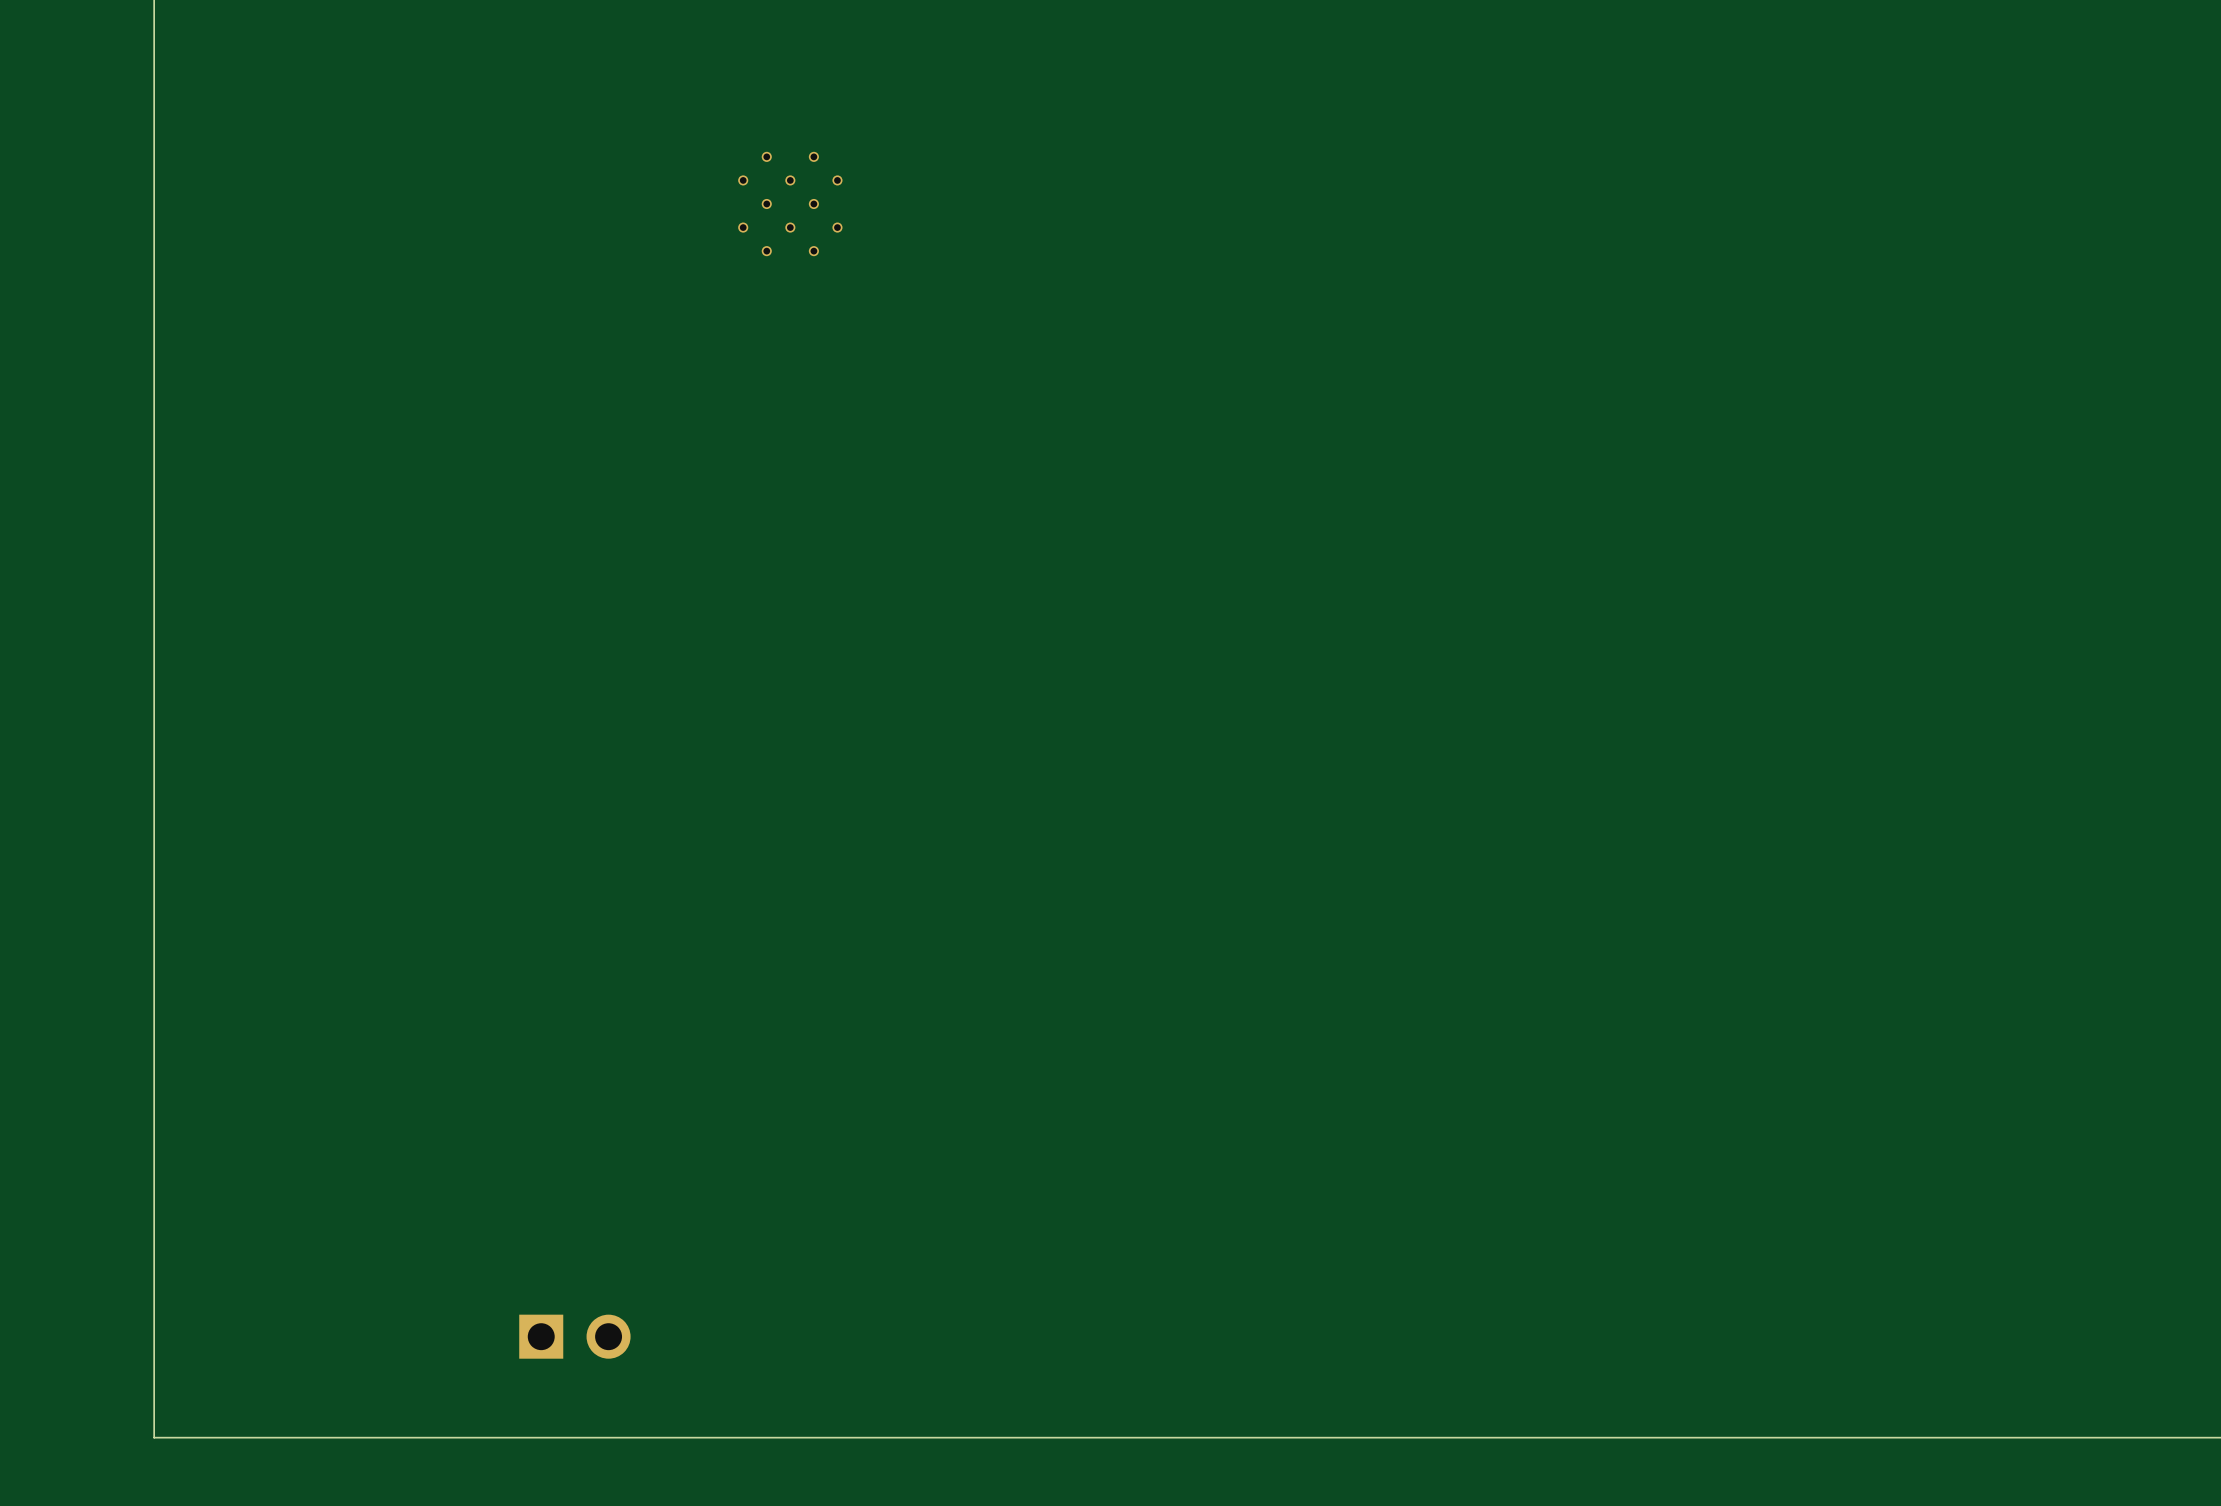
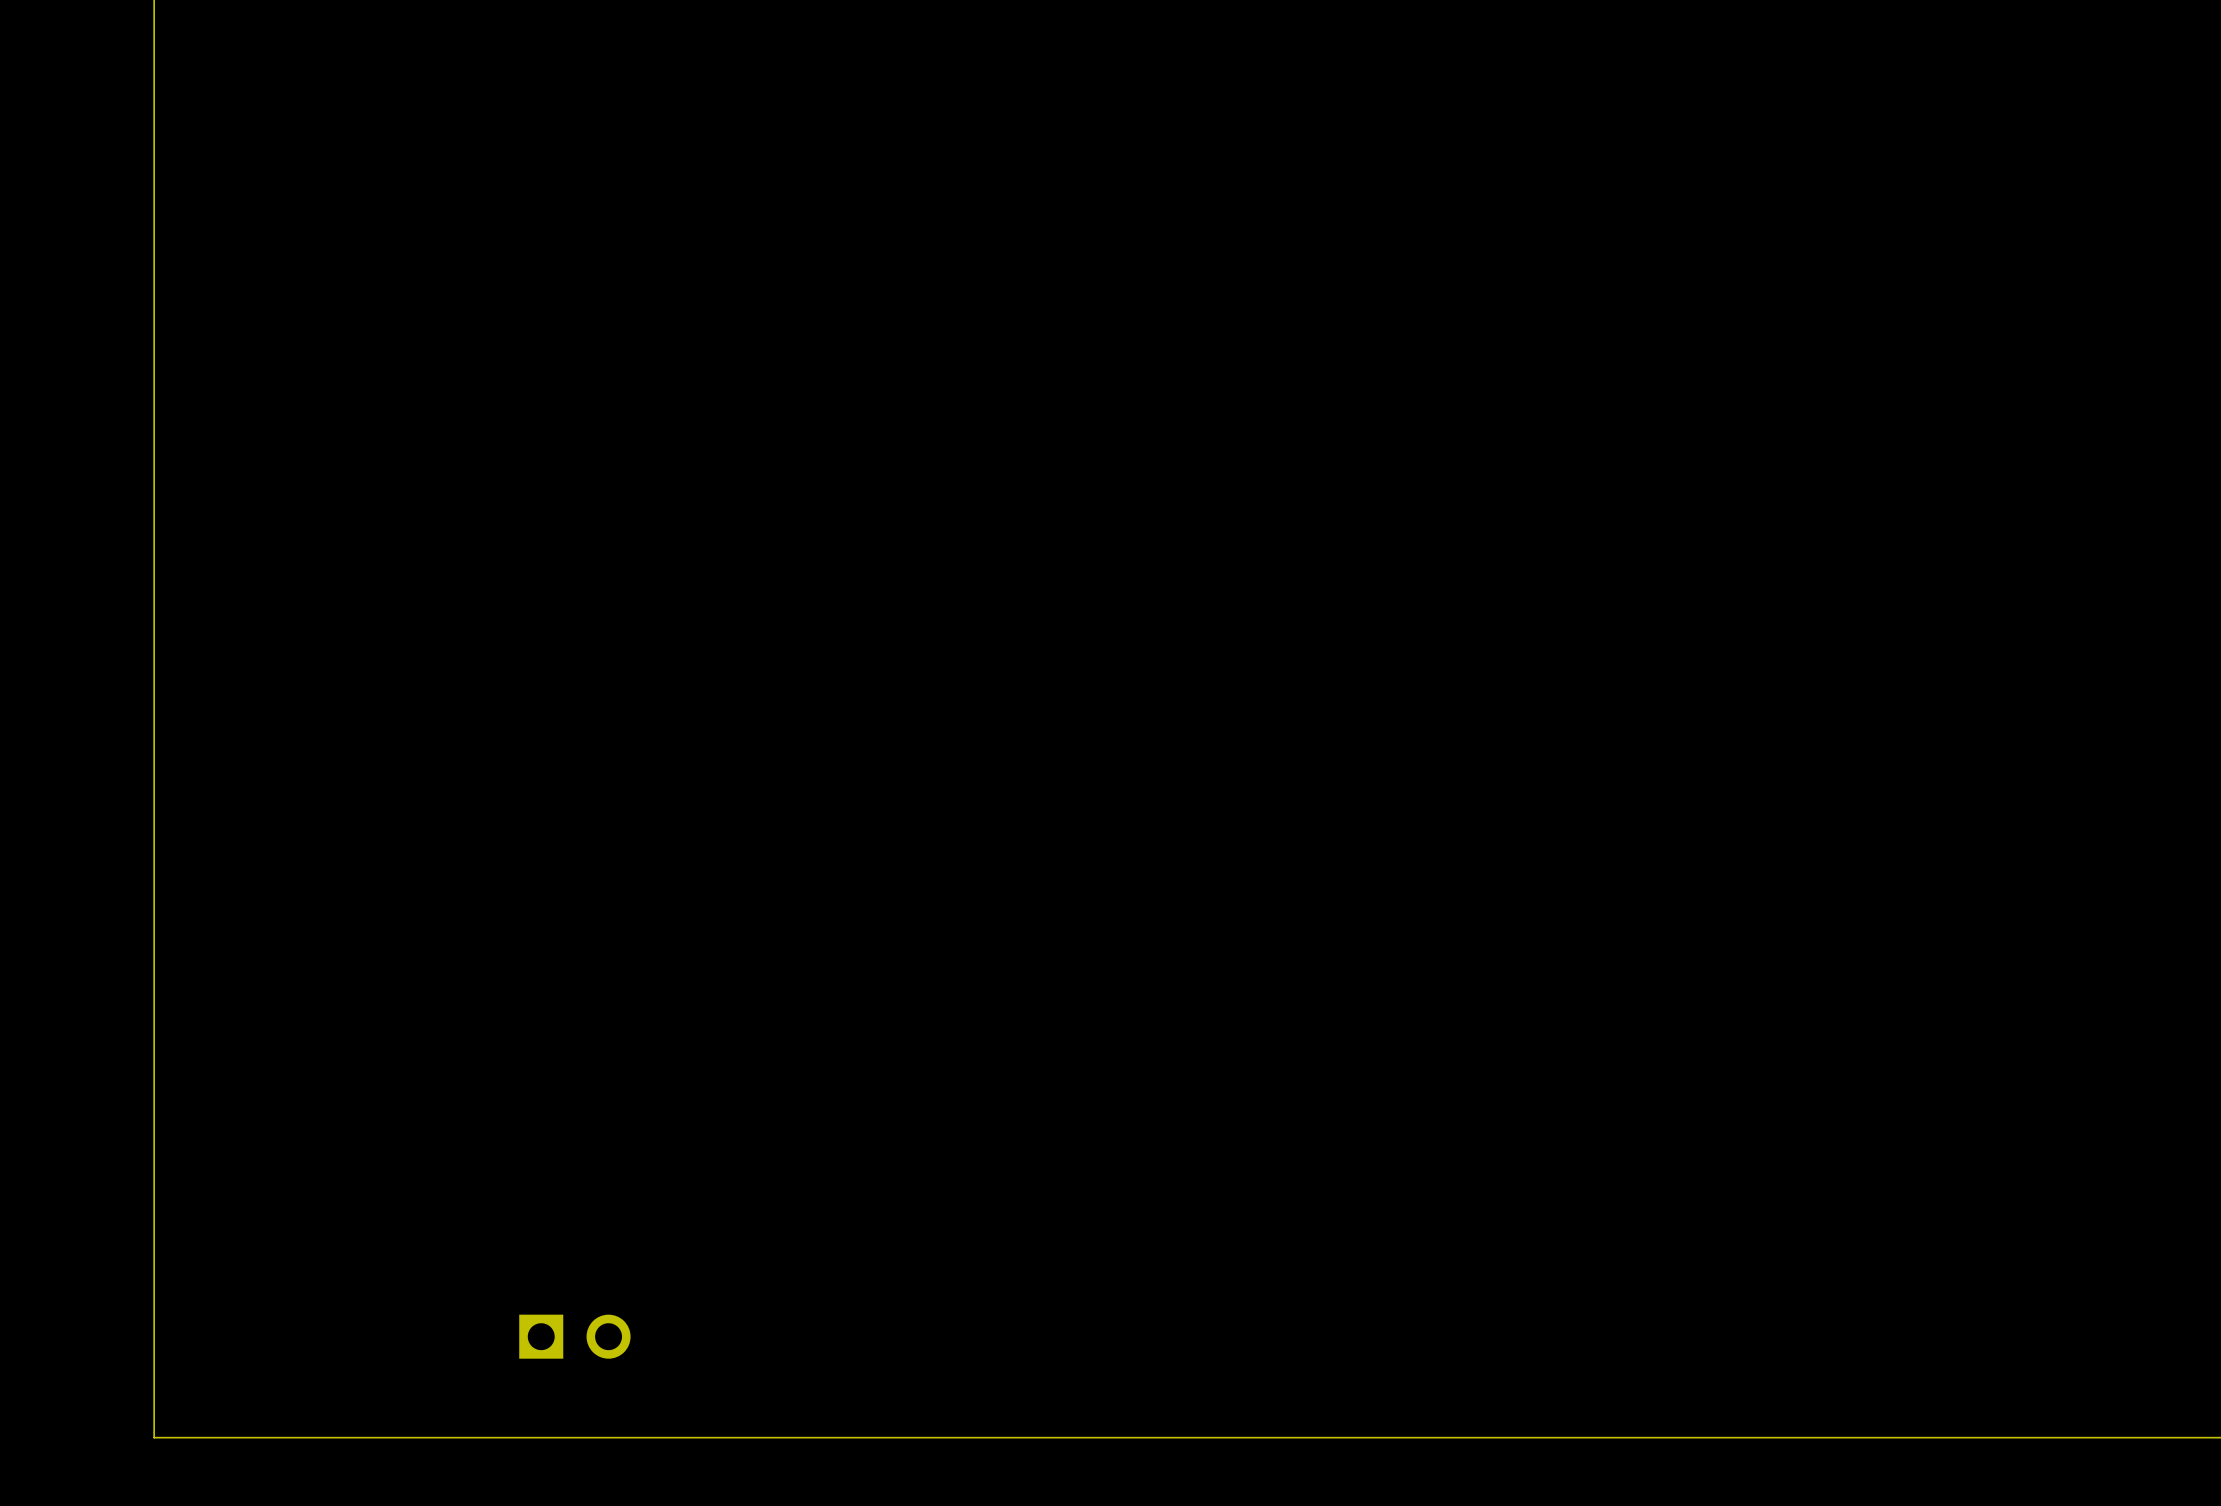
part: (790, 204) -> none

